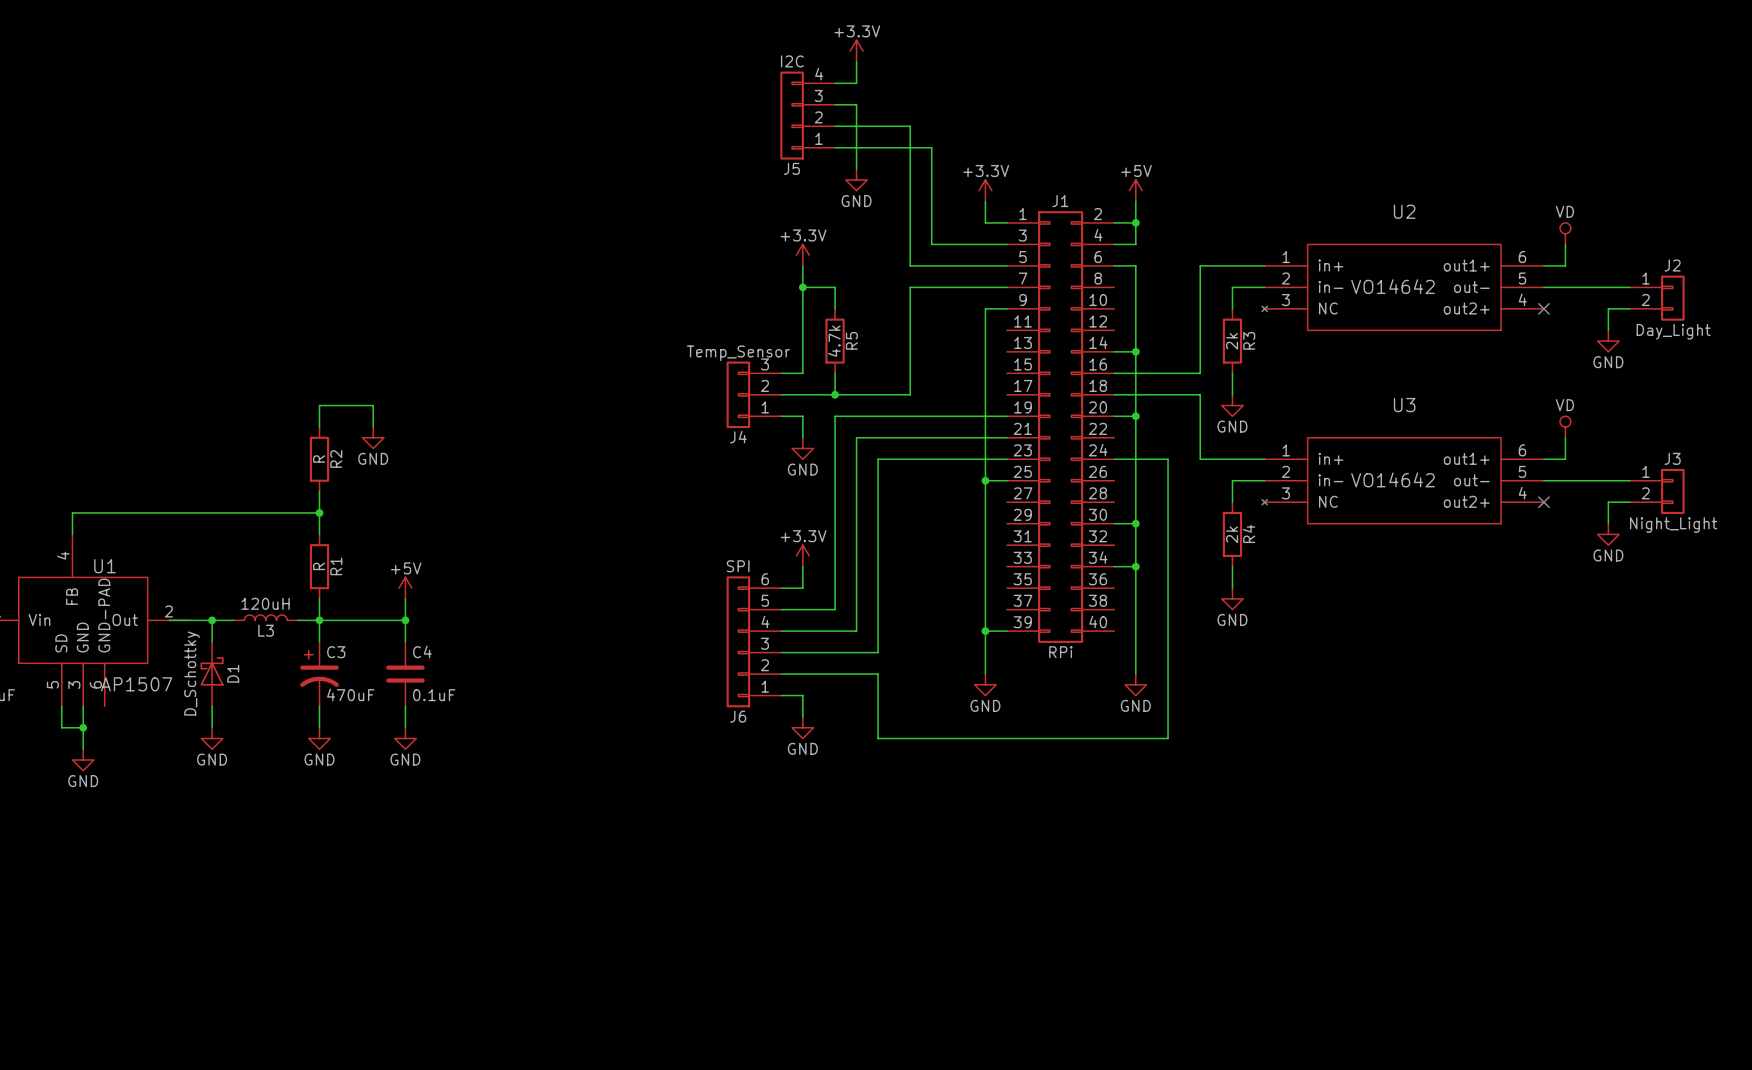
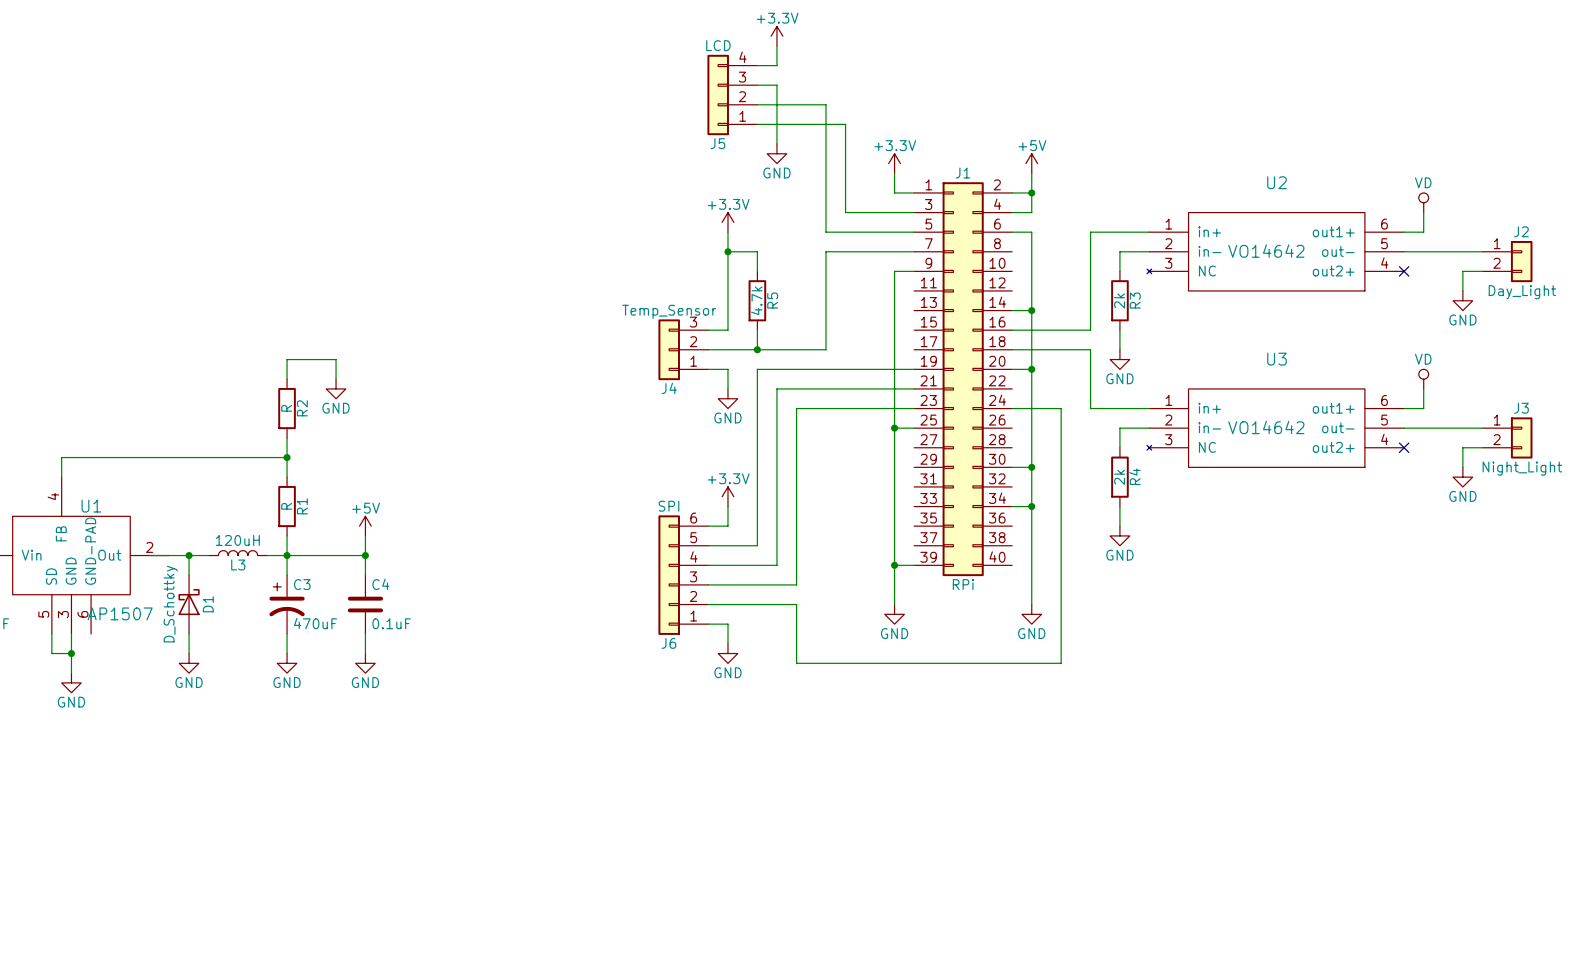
J5 value: I2C (792, 61) -> LCD (718, 45)

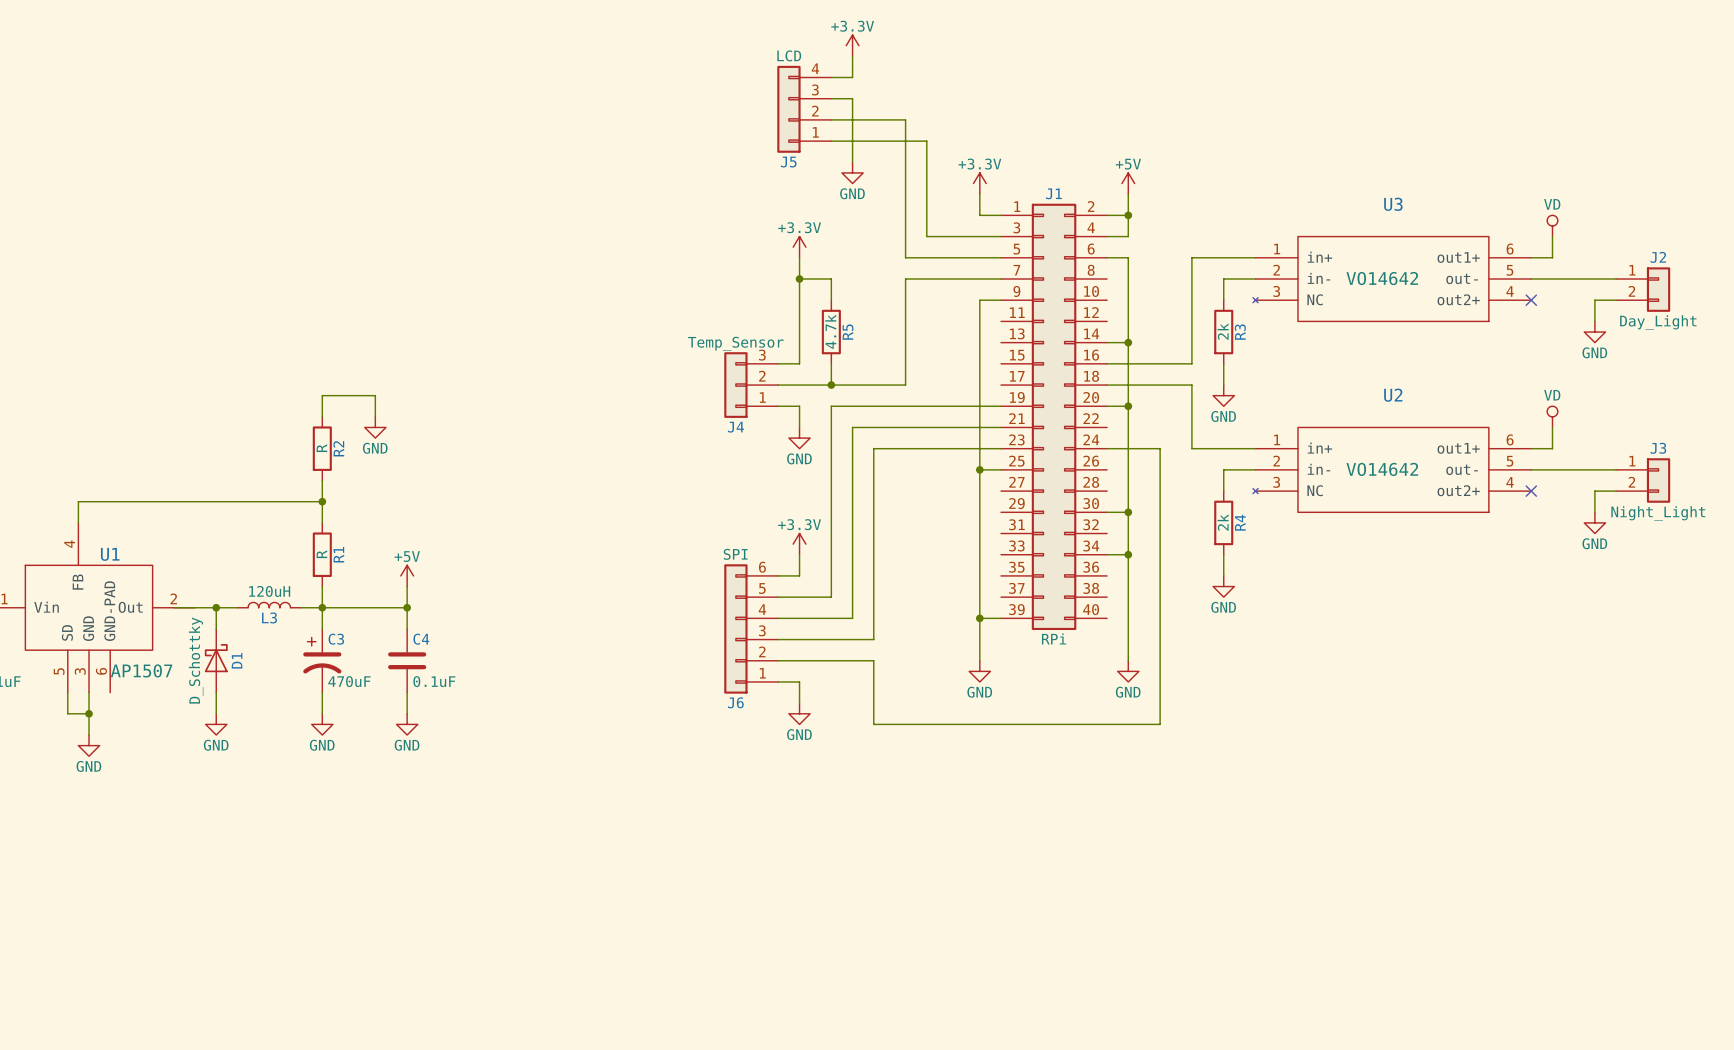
U2 name: U2 (1277, 182) -> U3 (1393, 204)
U3 name: U3 (1277, 359) -> U2 (1393, 395)

